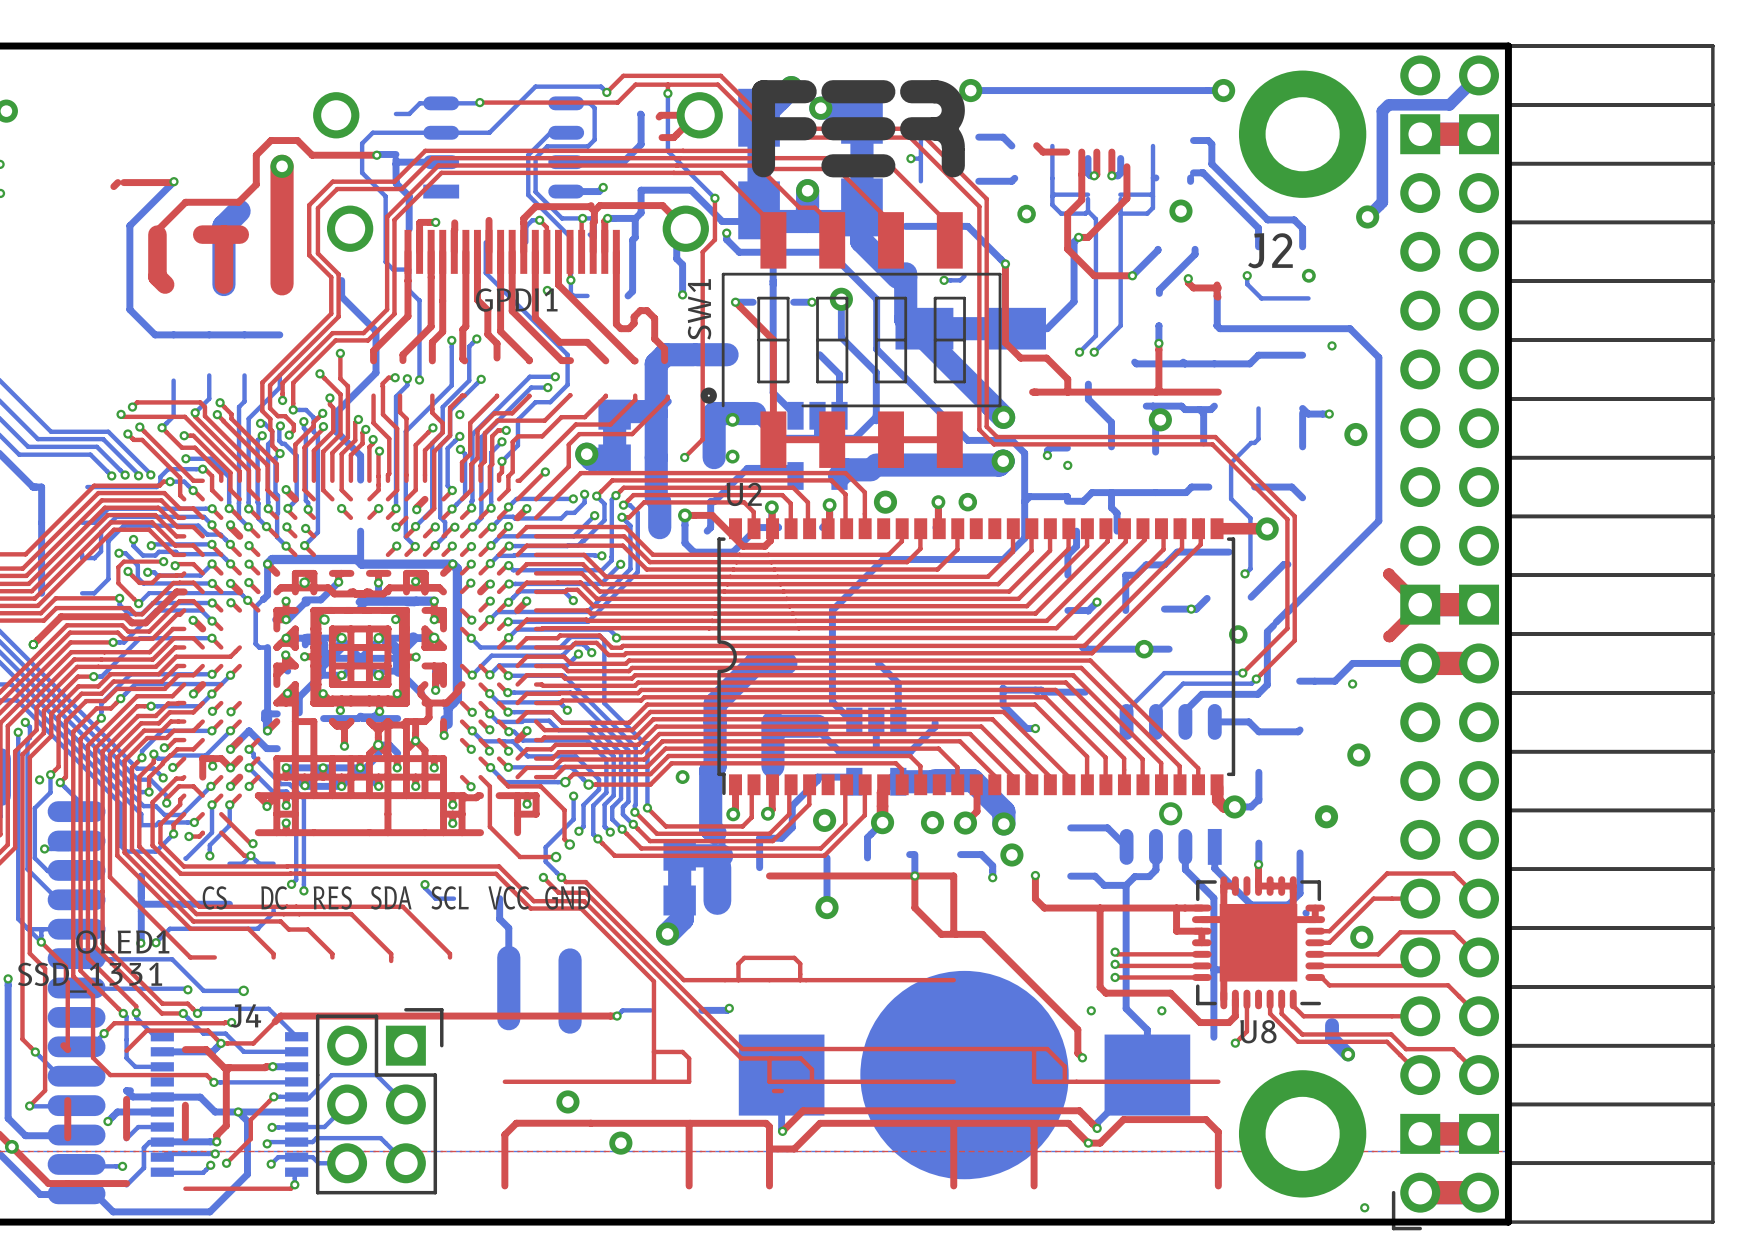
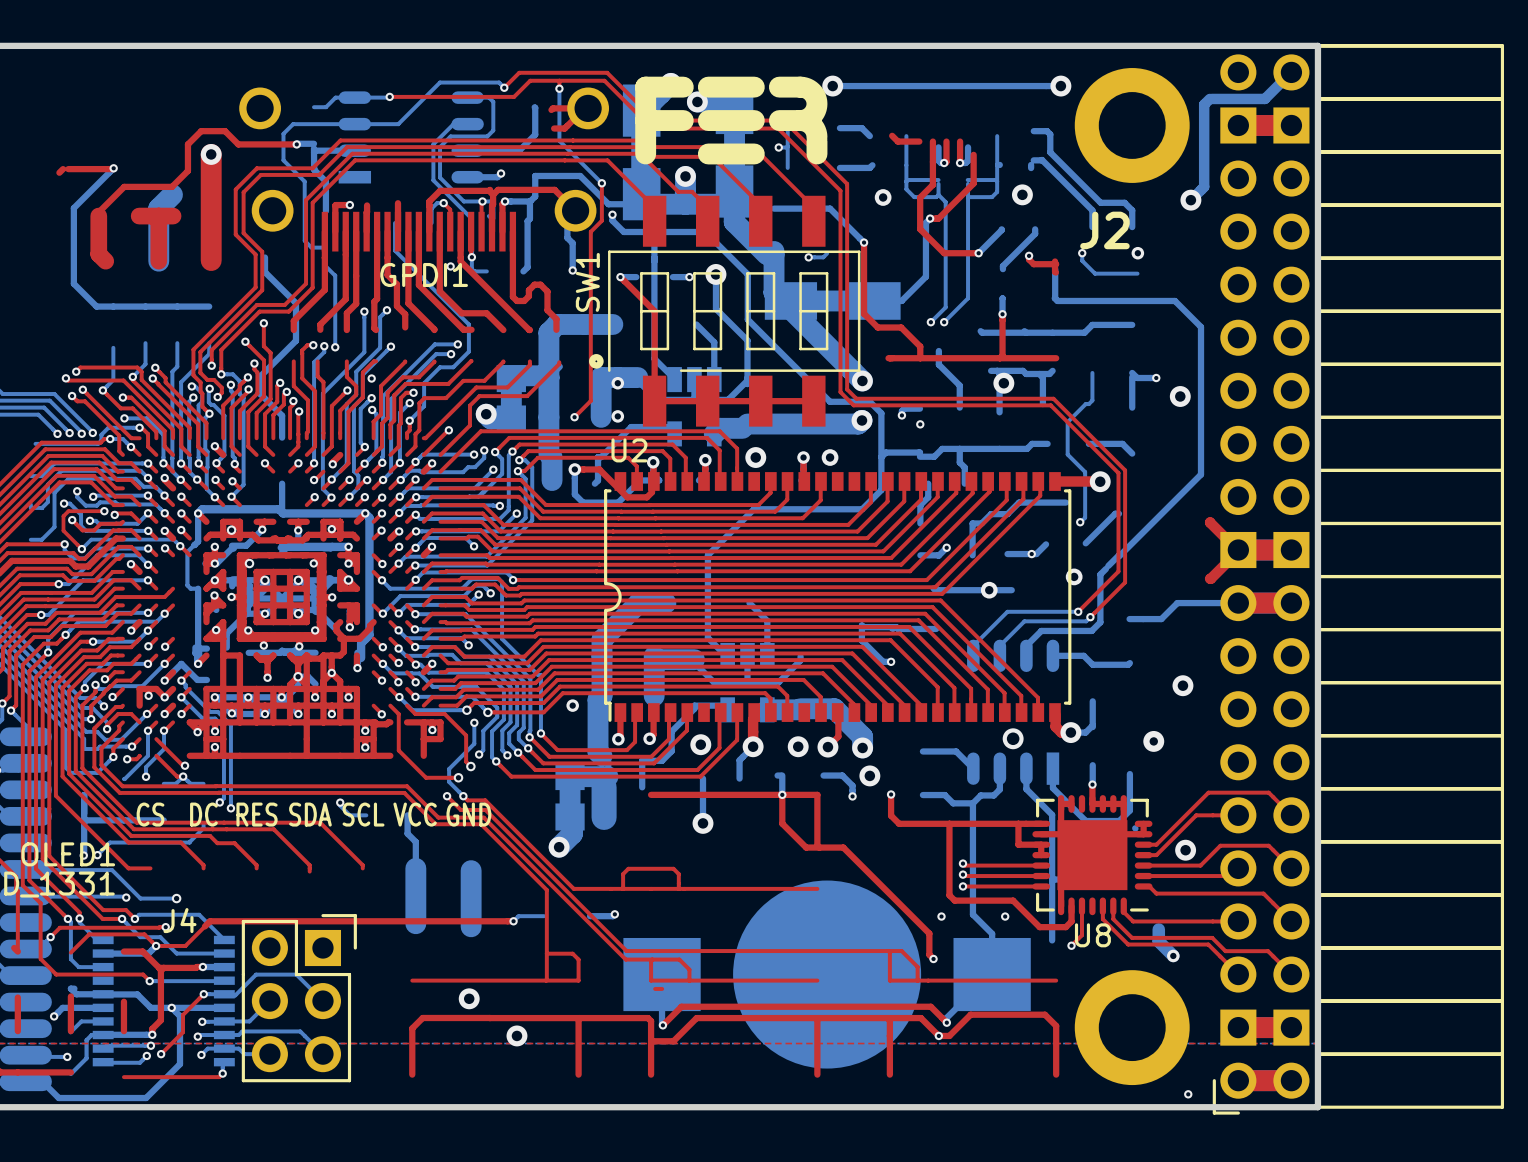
via: (1332, 345) -> none
via: (1352, 684) -> none

